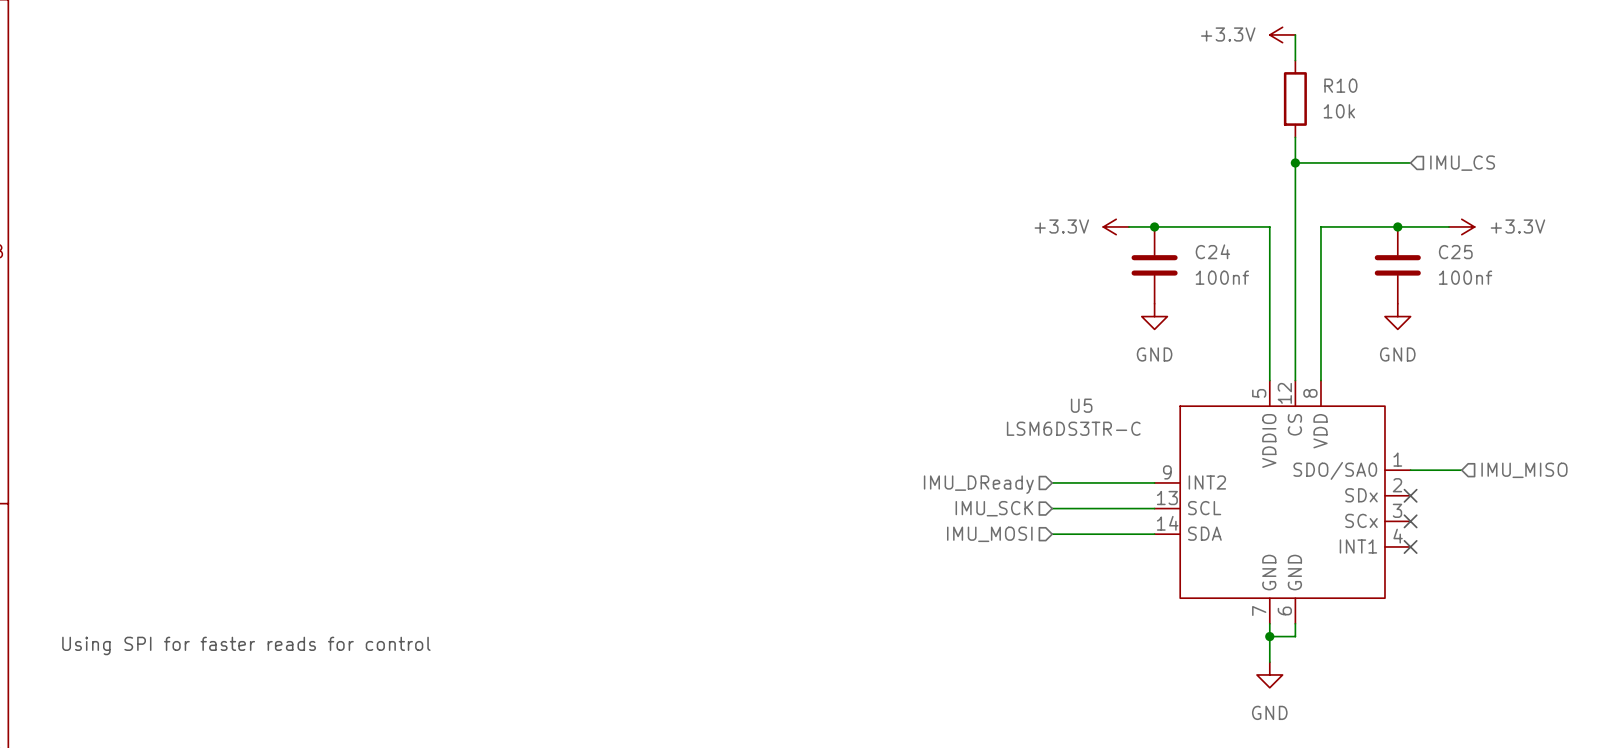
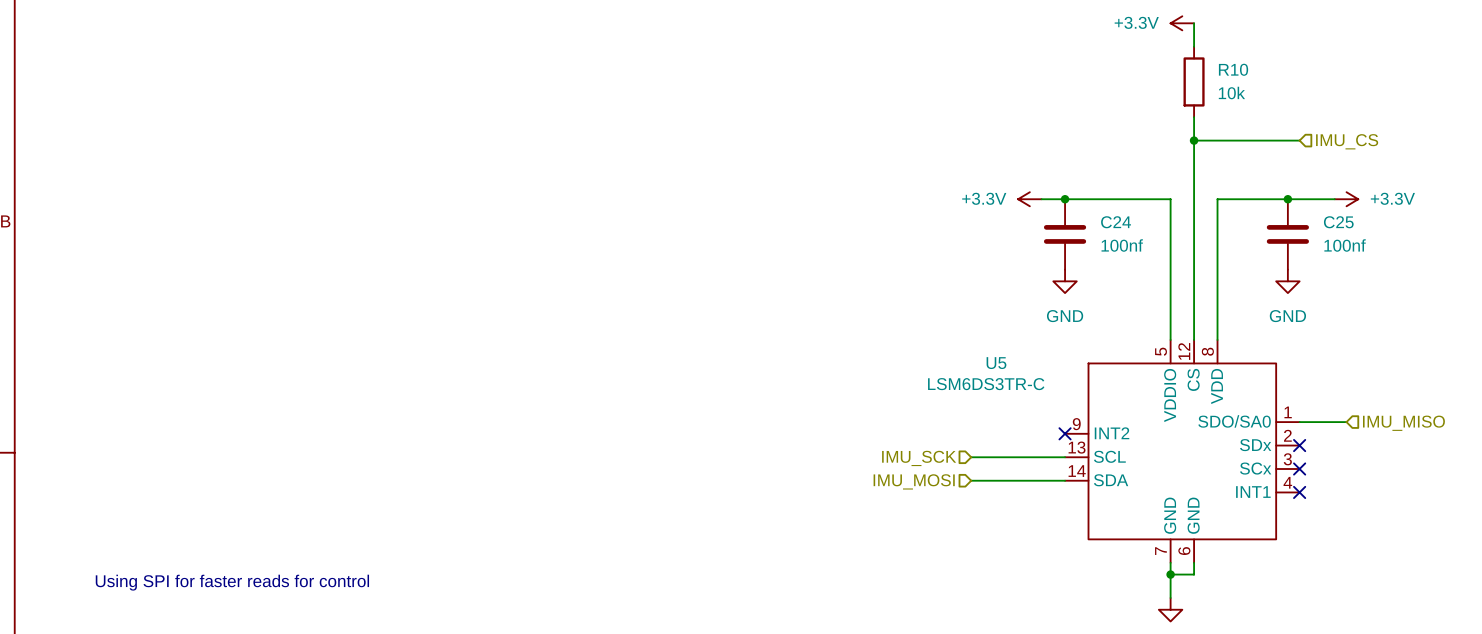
wire: (1052, 482) (1154, 482) -> none
no-connect mark: none -> (1065, 433)
hierarchical label: IMU_DReady (978, 484) -> none

